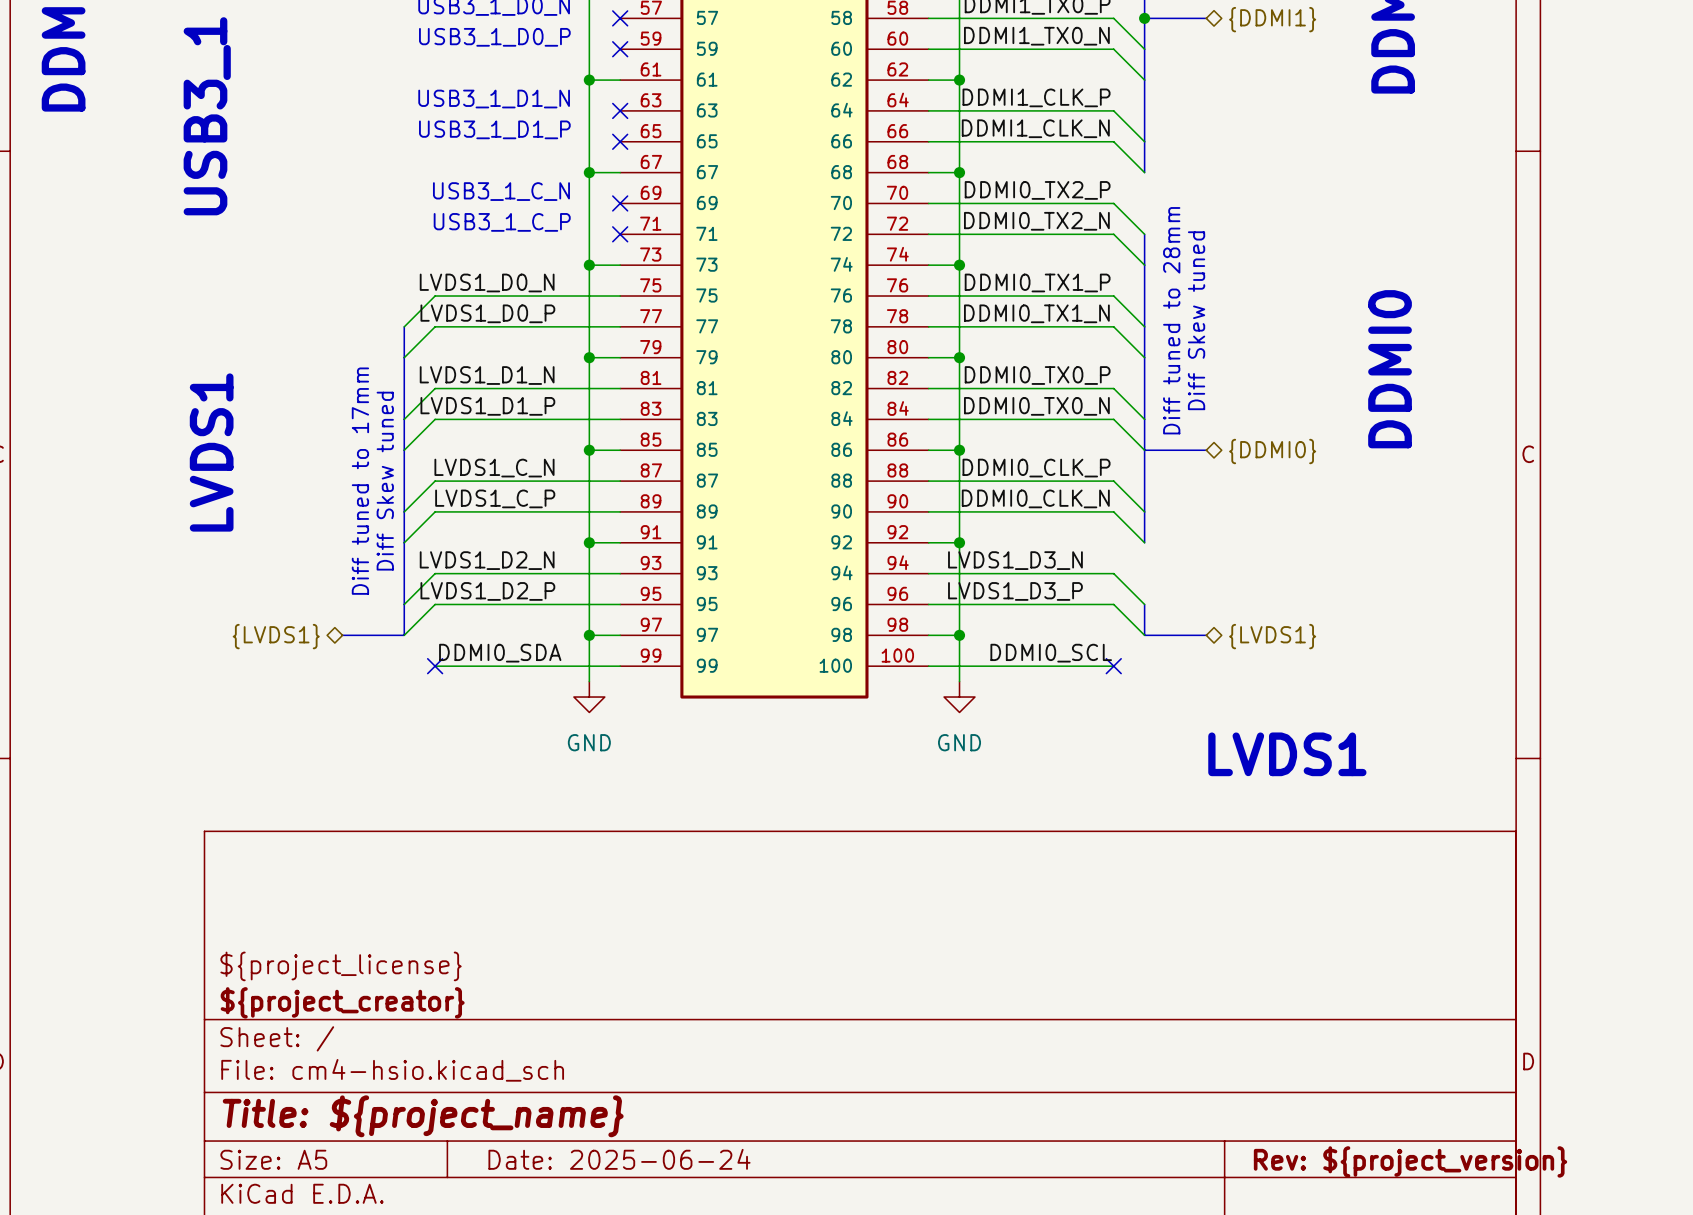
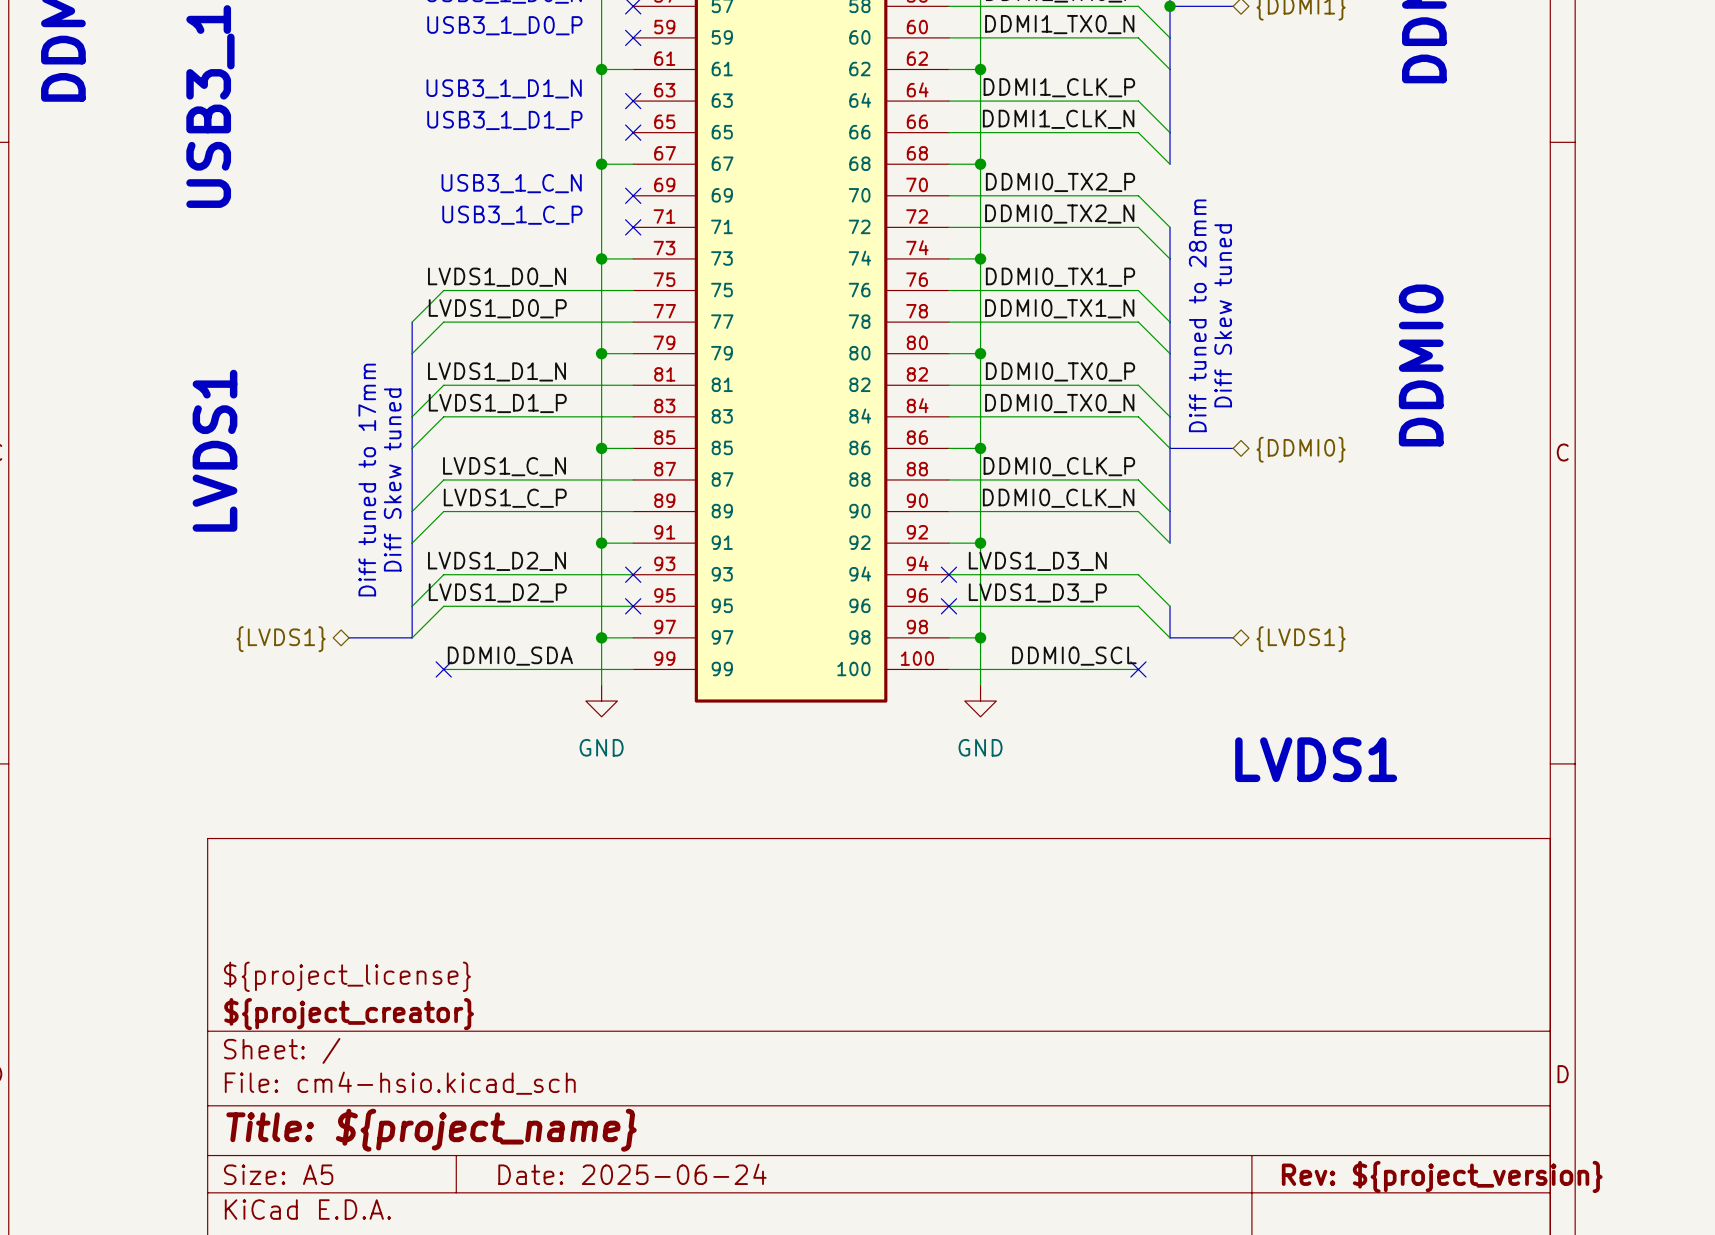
no-connect mark: none -> (633, 574)
no-connect mark: none -> (948, 574)
no-connect mark: none -> (633, 606)
no-connect mark: none -> (948, 606)

